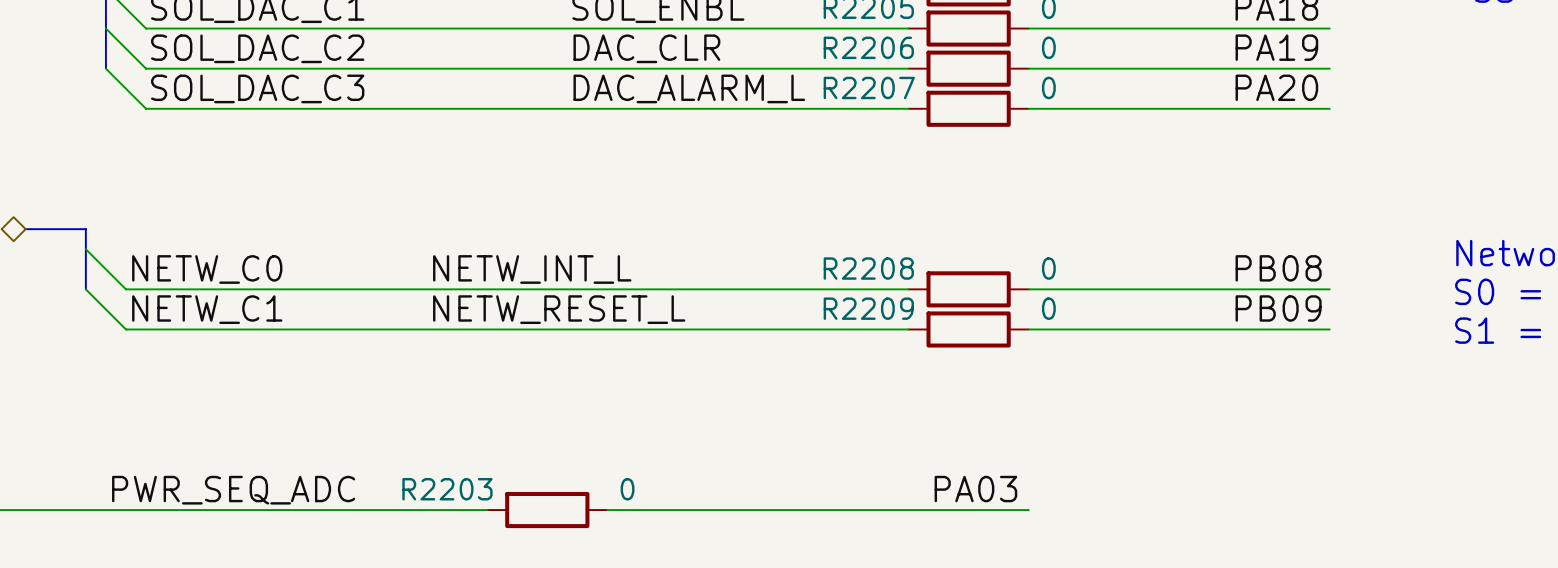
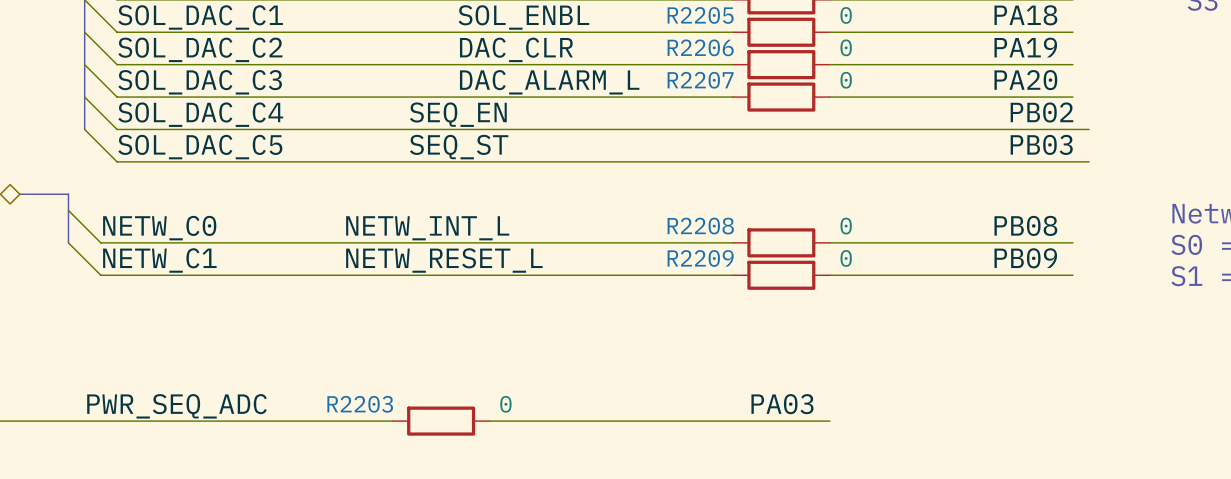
bus: none -> (84, 64) (84, 129)
wire: none -> (84, 97) (117, 129) (1089, 129)
label: none -> PB02 (1041, 112)
label: none -> SOL_DAC_C4 (200, 114)
label: none -> SEQ_EN (458, 114)
wire: none -> (84, 129) (117, 161) (1089, 161)
label: none -> PB03 (1041, 144)
label: none -> SOL_DAC_C5 (200, 147)
label: none -> SEQ_ST (459, 147)

